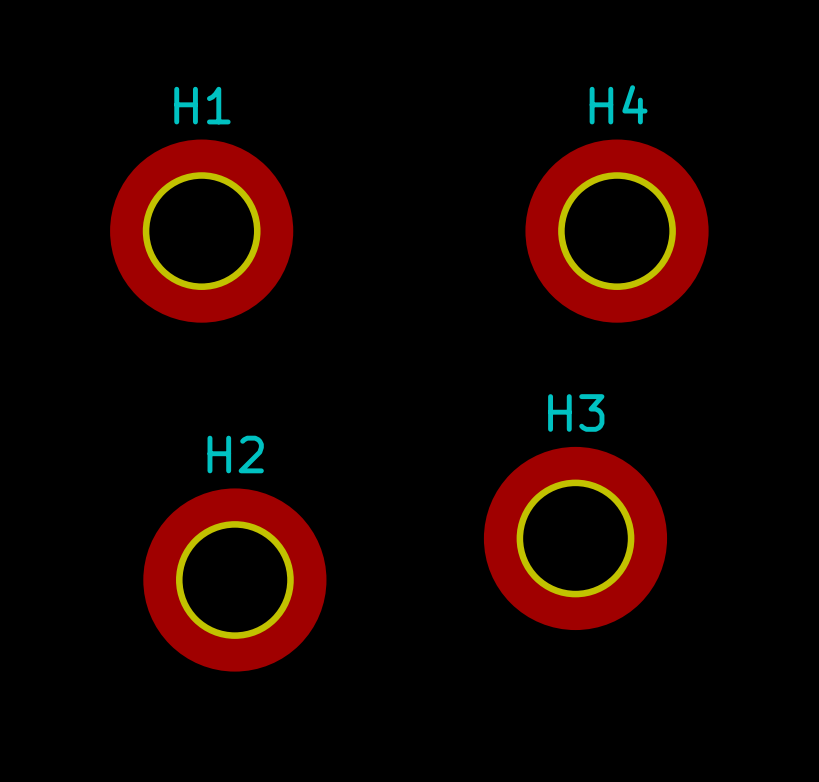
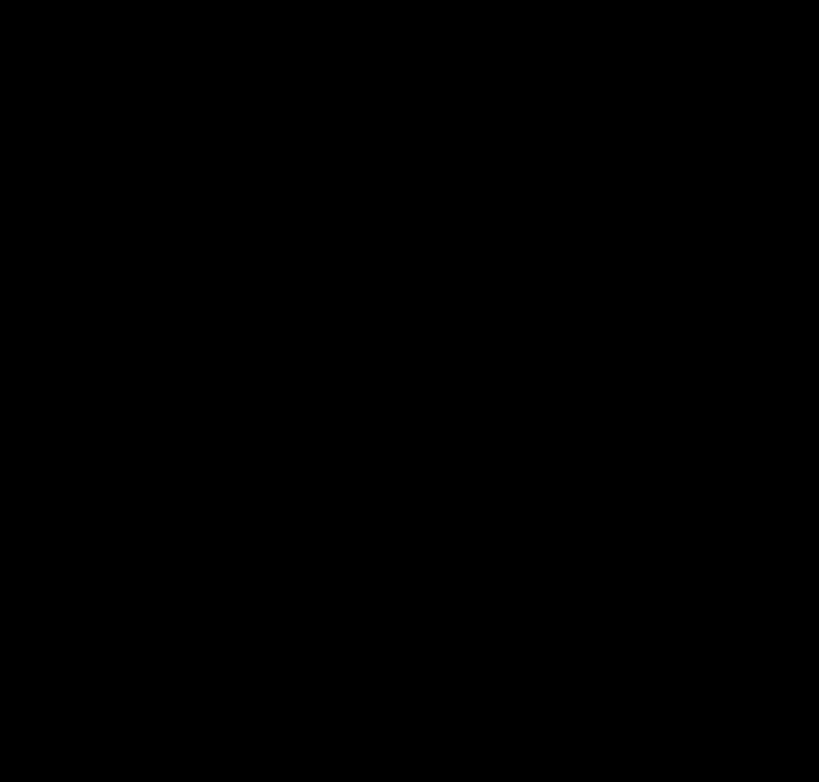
H1: (201, 231) -> none
H4: (617, 231) -> none
H3: (575, 538) -> none
H2: (234, 580) -> none

